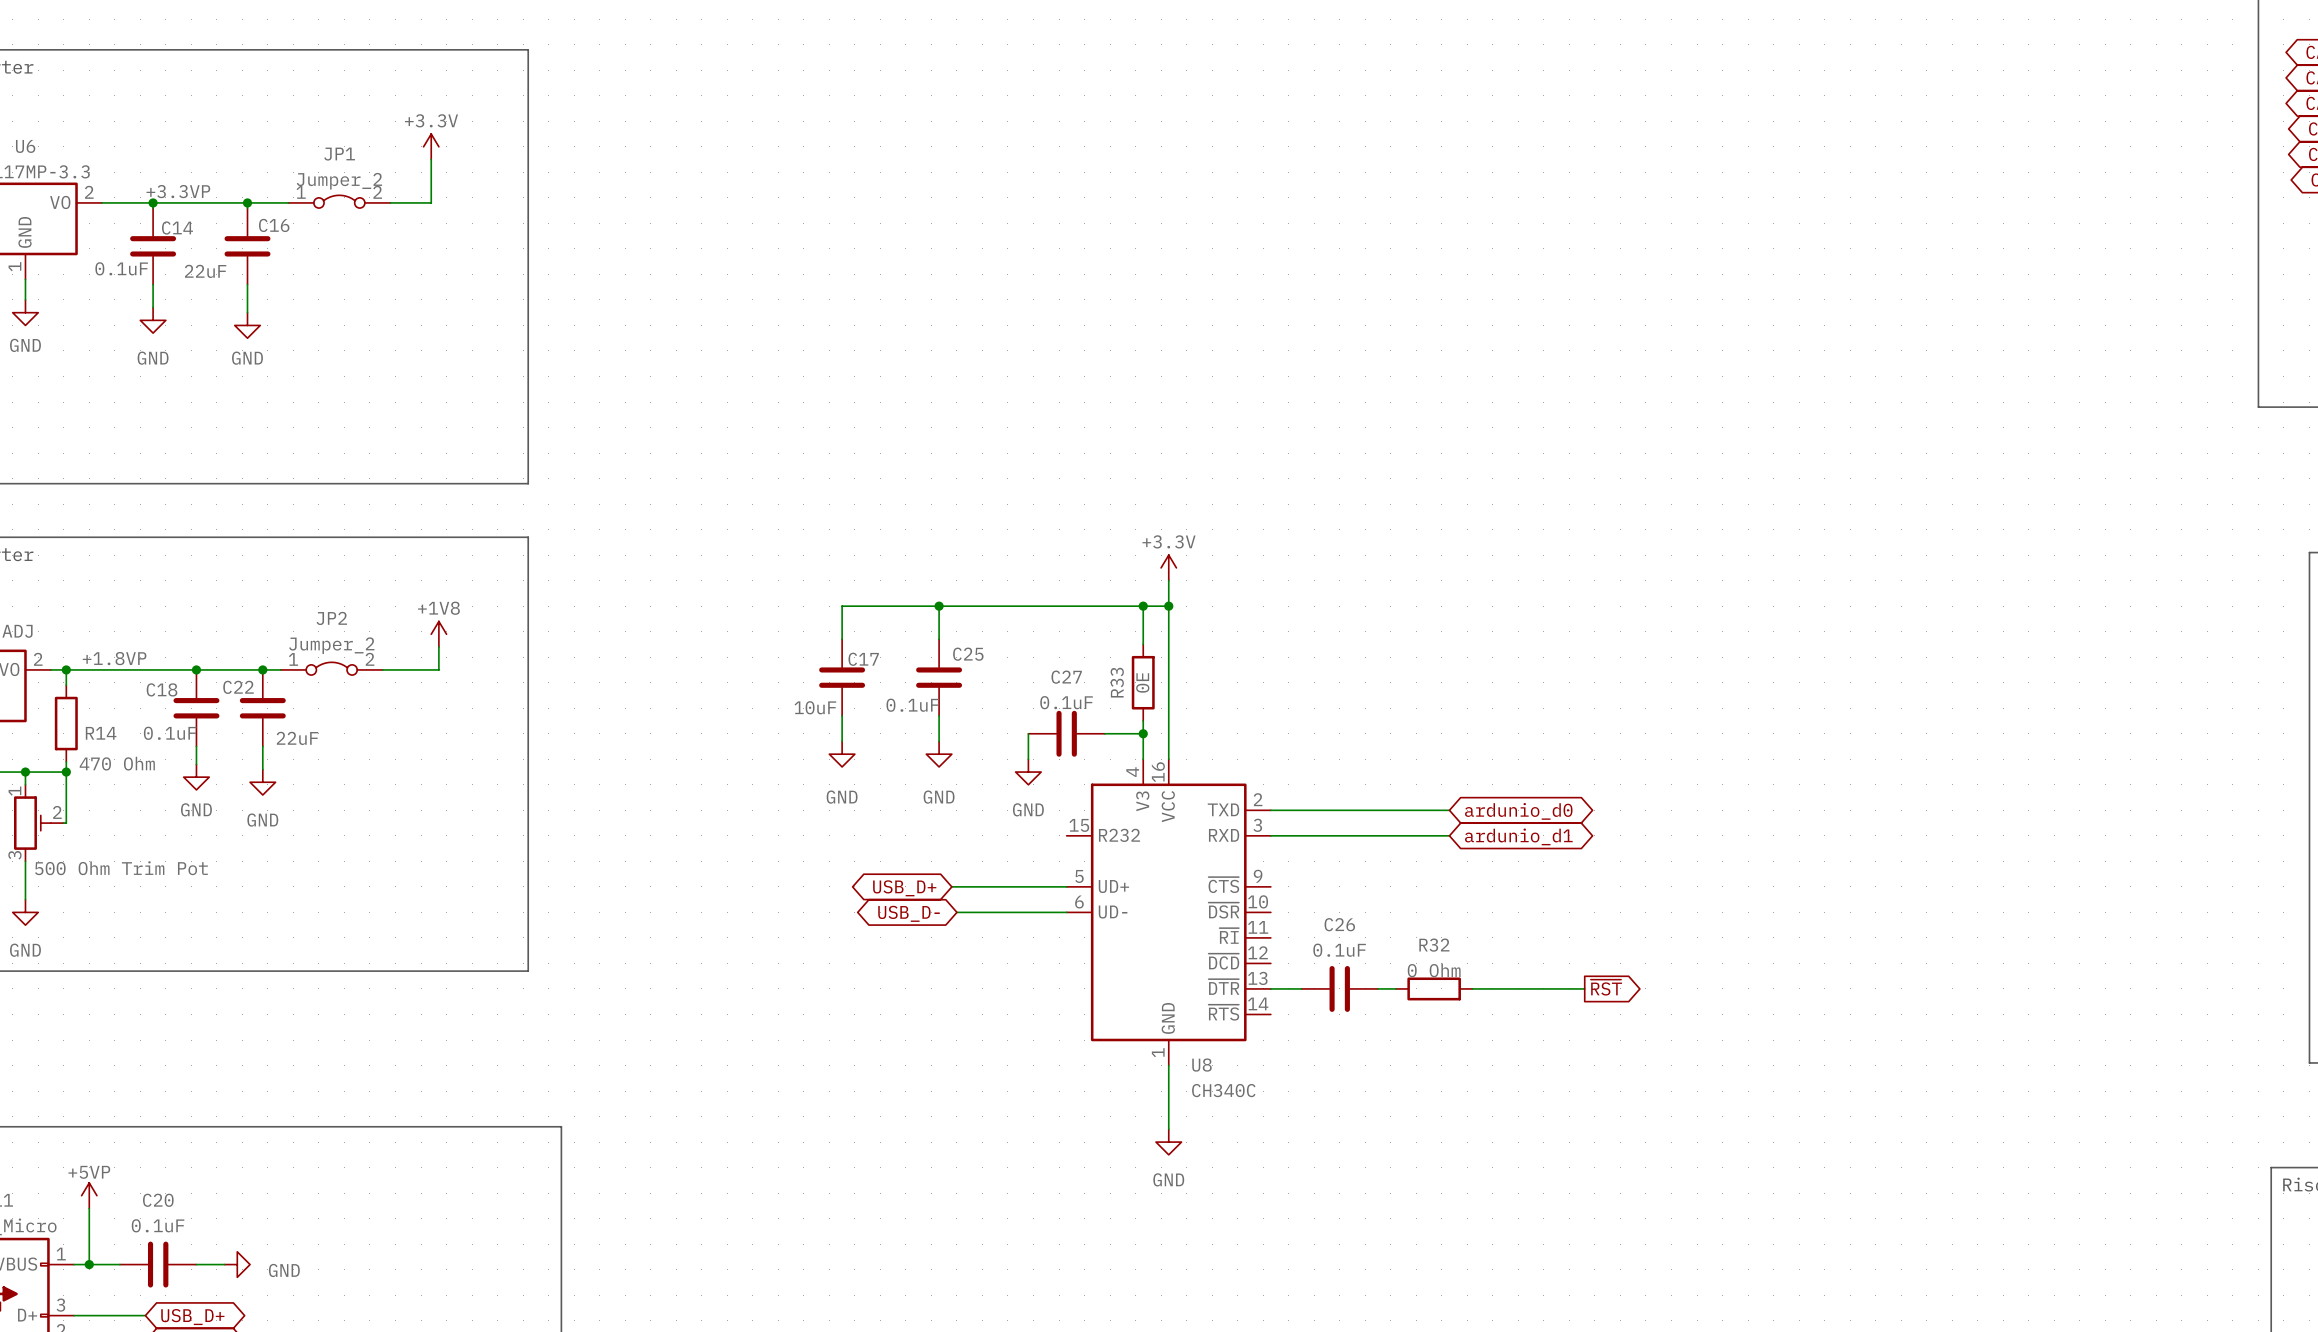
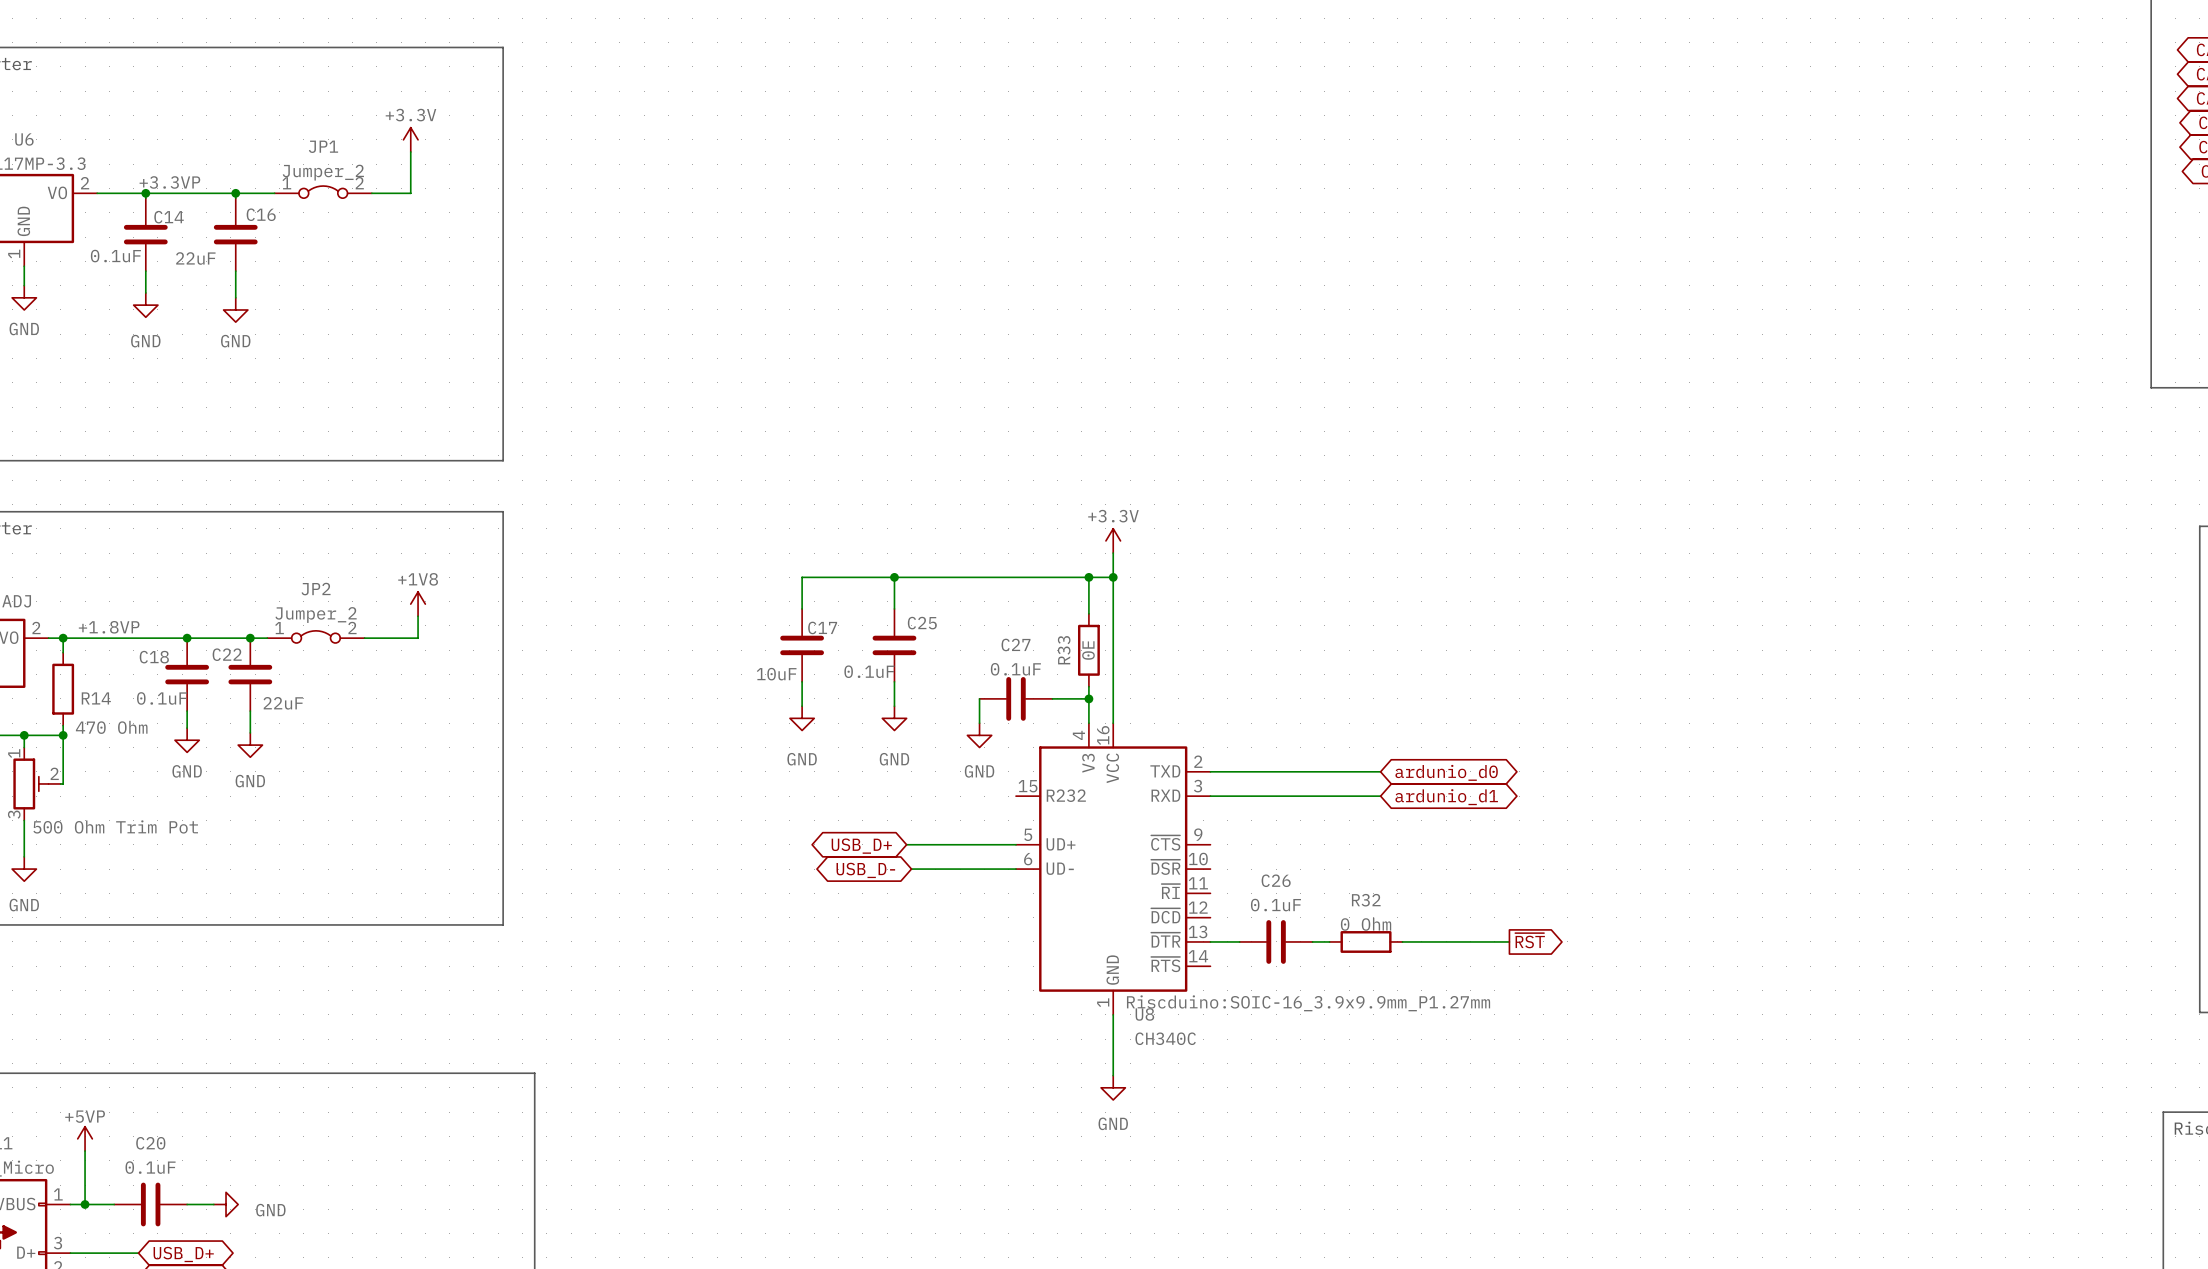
U8 text: none -> Riscduino:SOIC-16_3.9x9.9mm_P1.27mm (1308, 1003)

